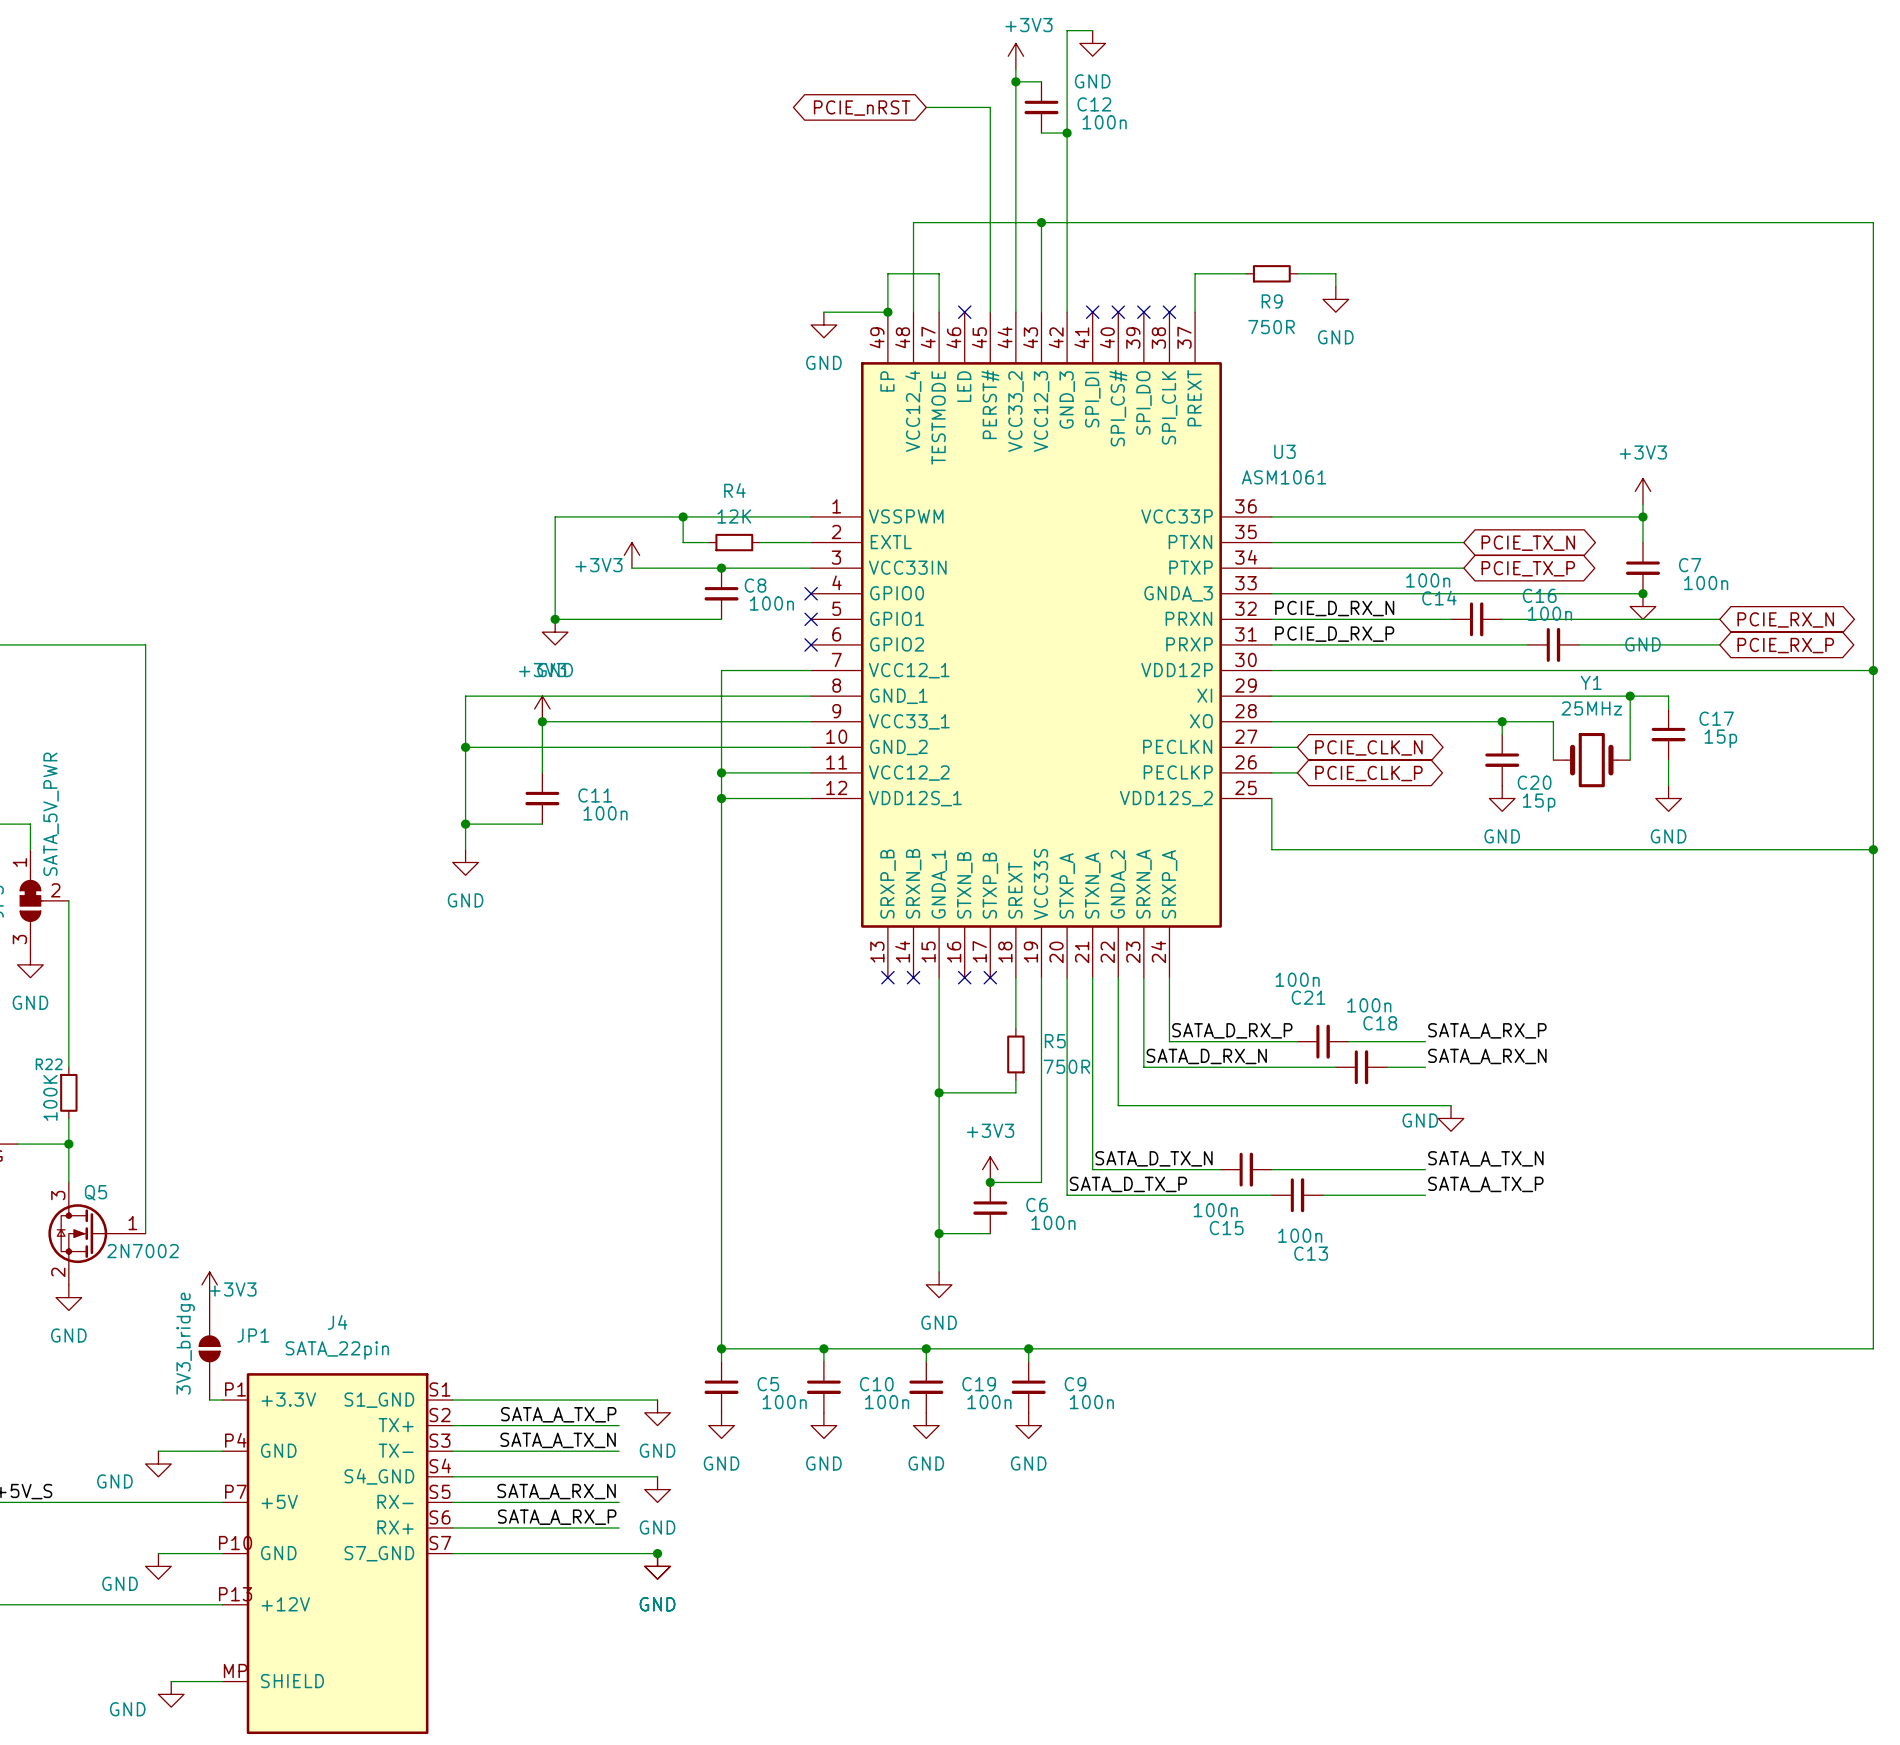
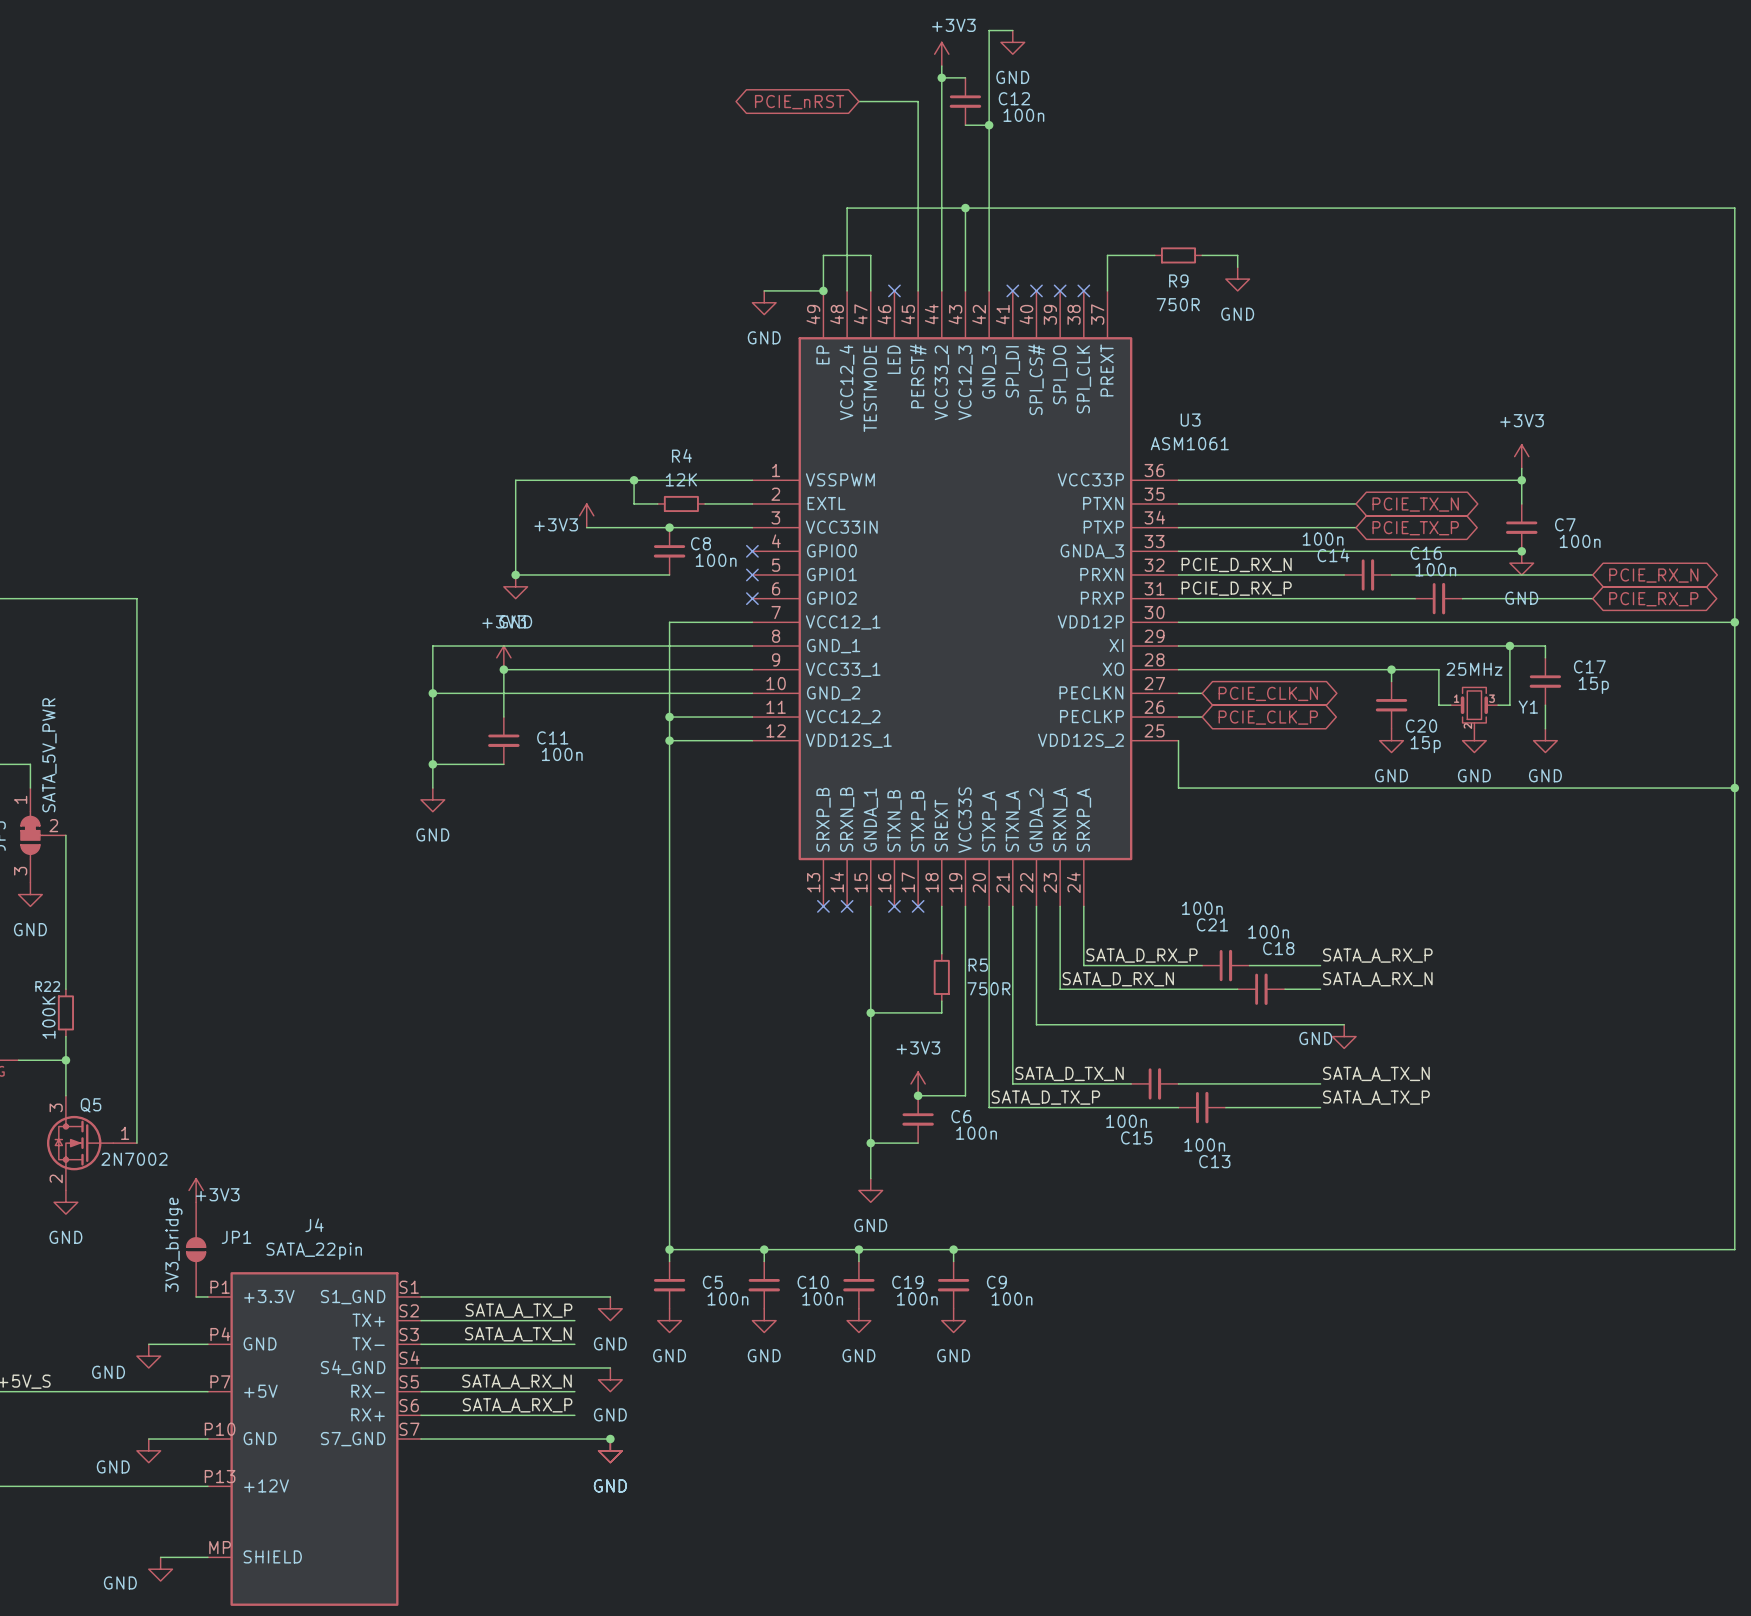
Y1 name position: Y1 (1591, 682) -> Y1 (1528, 707)
Y1 symbol: [1553, 732, 1631, 788] -> [1450, 687, 1499, 729]
power symbol: none -> GND (1474, 740)

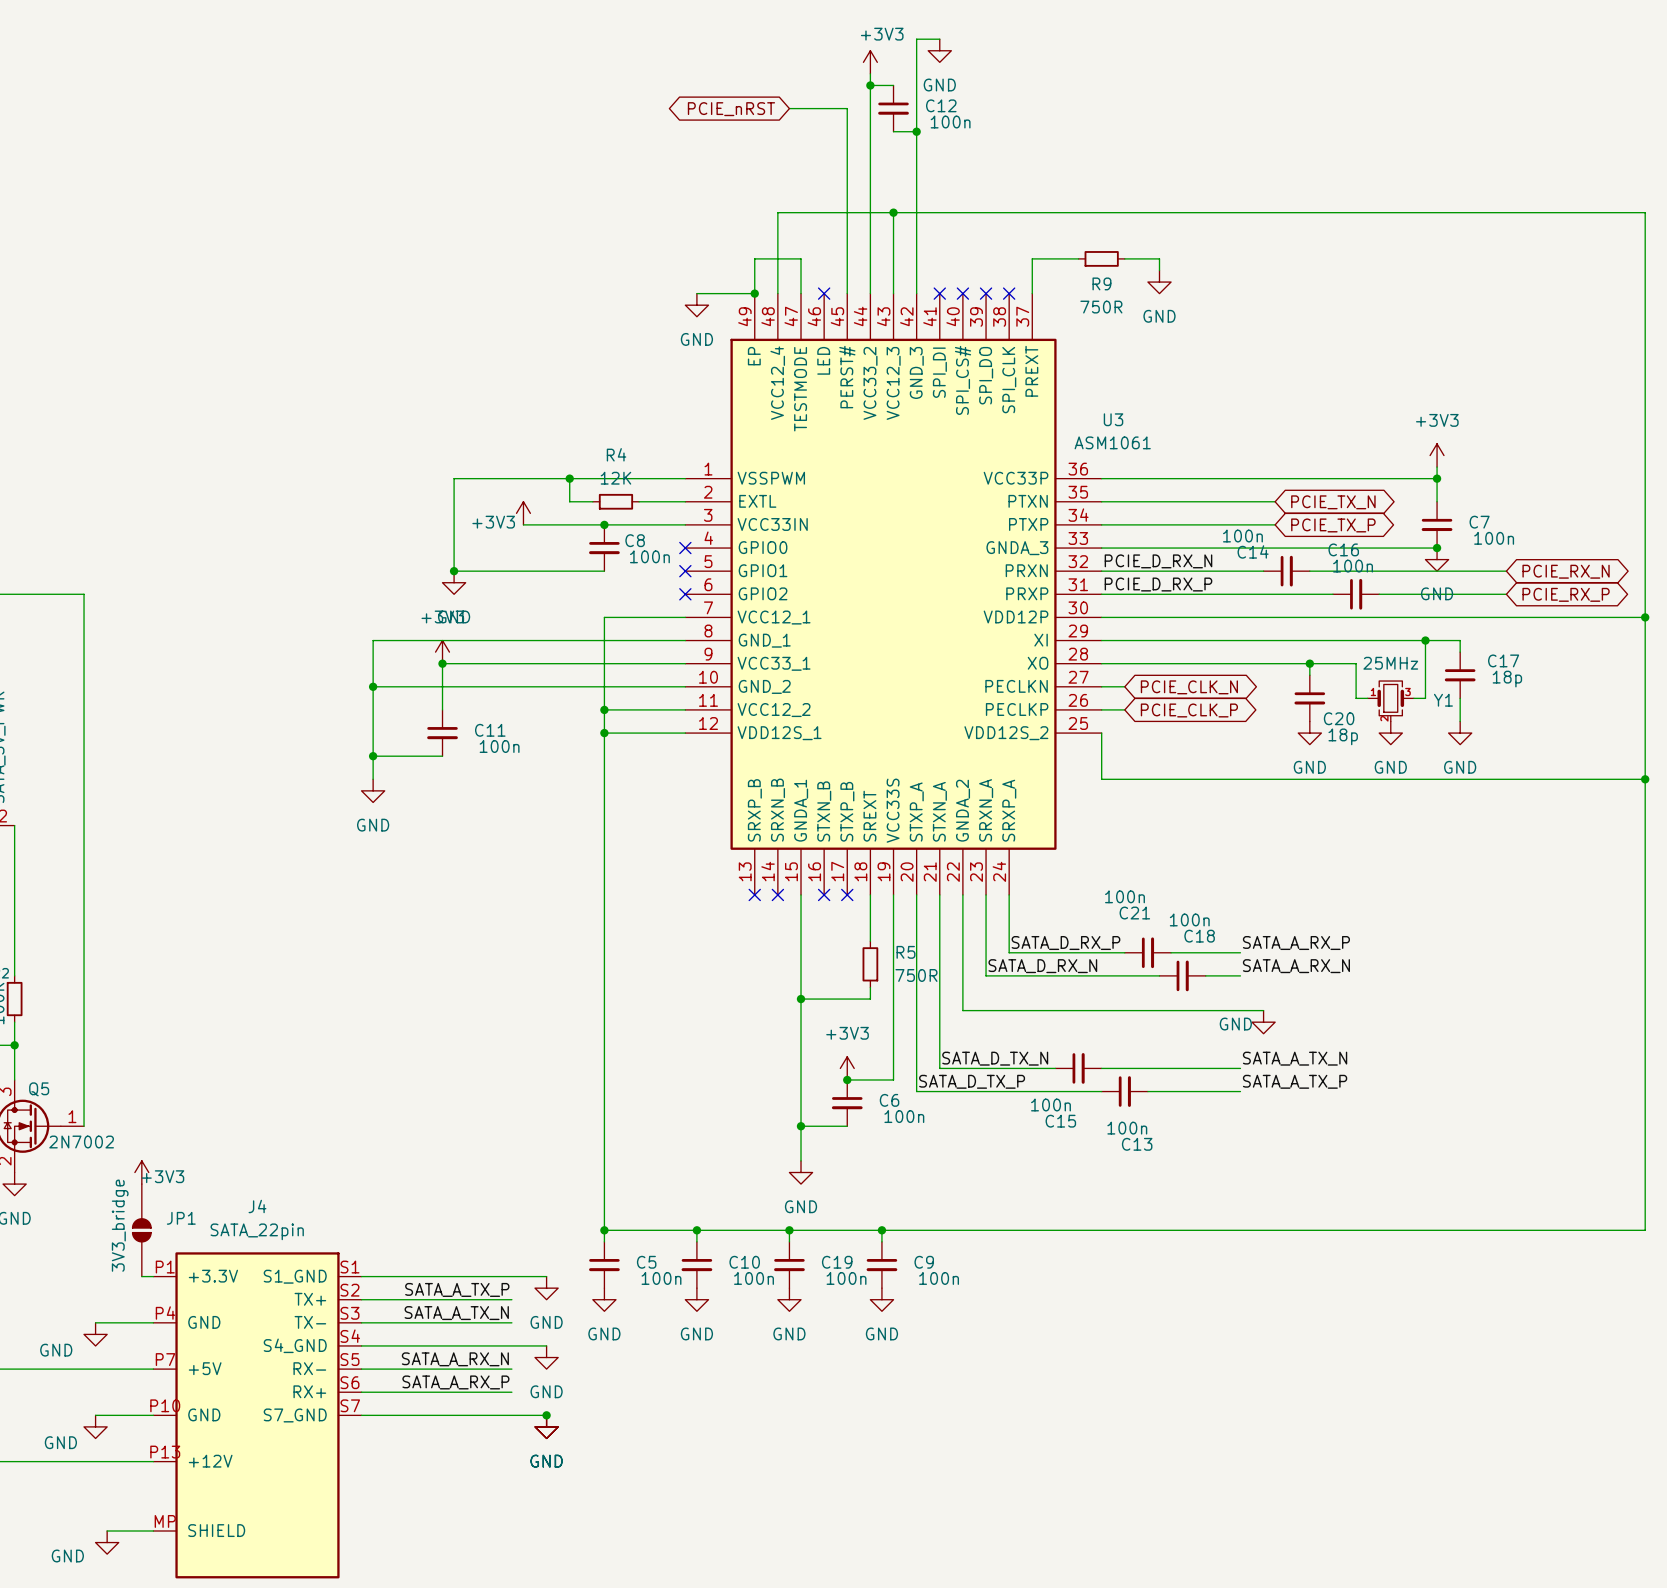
C17 value: 15p (1593, 685) -> 18p (1507, 679)
C20 value: 15p (1425, 744) -> 18p (1343, 736)

